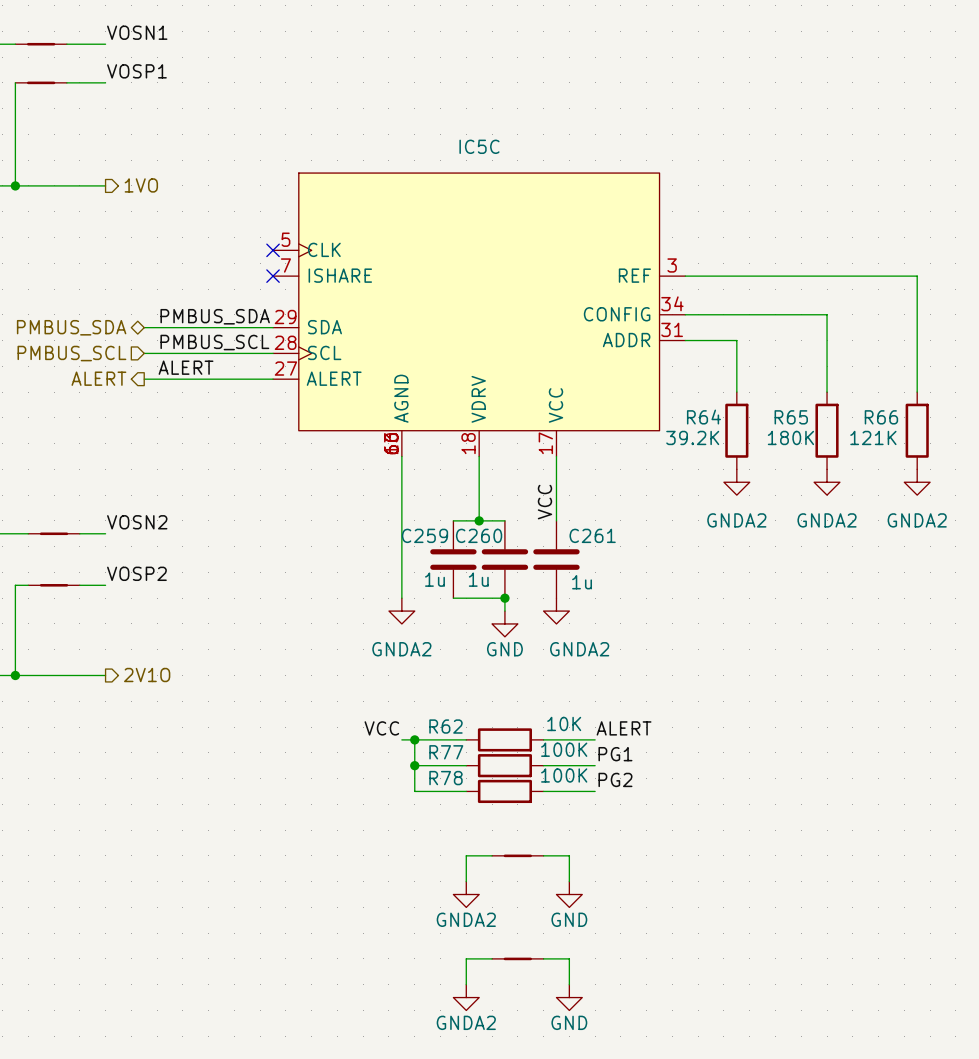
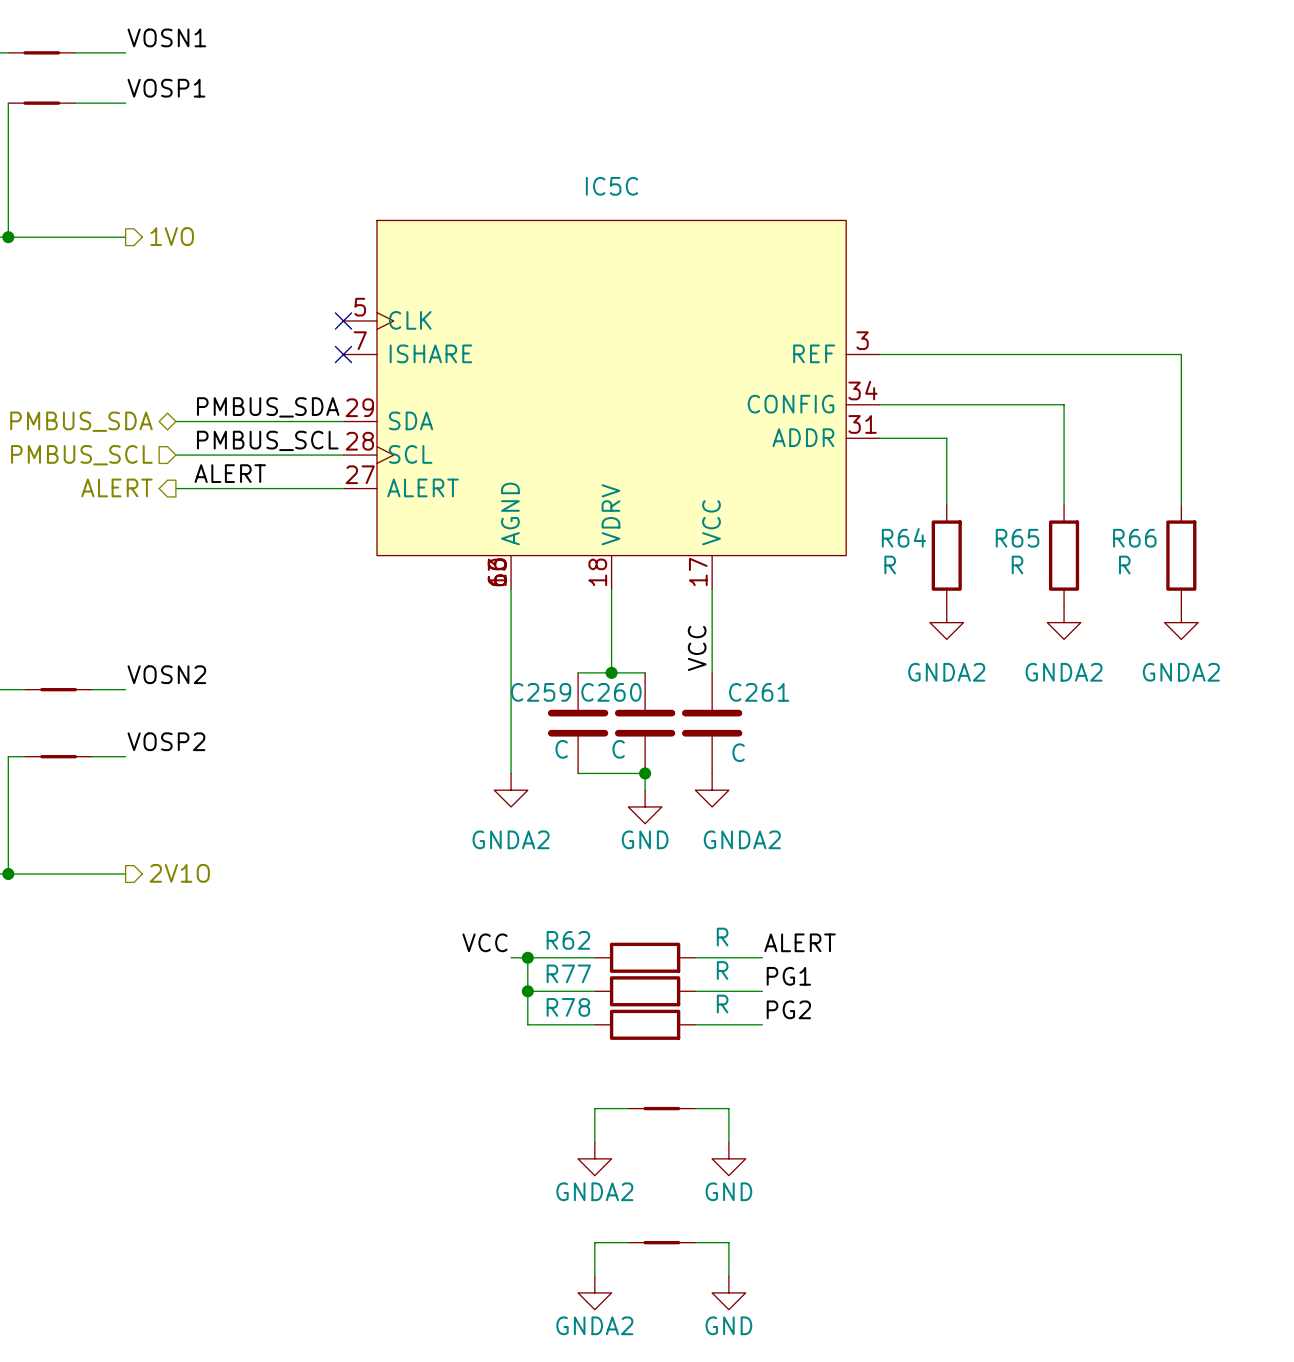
R64 value: 39.2K (692, 437) -> R (890, 565)
R65 value: 180K (790, 437) -> R (1017, 565)
R66 value: 121K (873, 437) -> R (1124, 565)
C259 value: 1u (434, 579) -> C (561, 749)
C260 value: 1u (478, 579) -> C (618, 749)
C261 value: 1u (582, 582) -> C (738, 752)
R62 value: 10K (564, 723) -> R (722, 937)
R77 value: 100K (564, 749) -> R (722, 970)
R78 value: 100K (564, 775) -> R (722, 1004)

